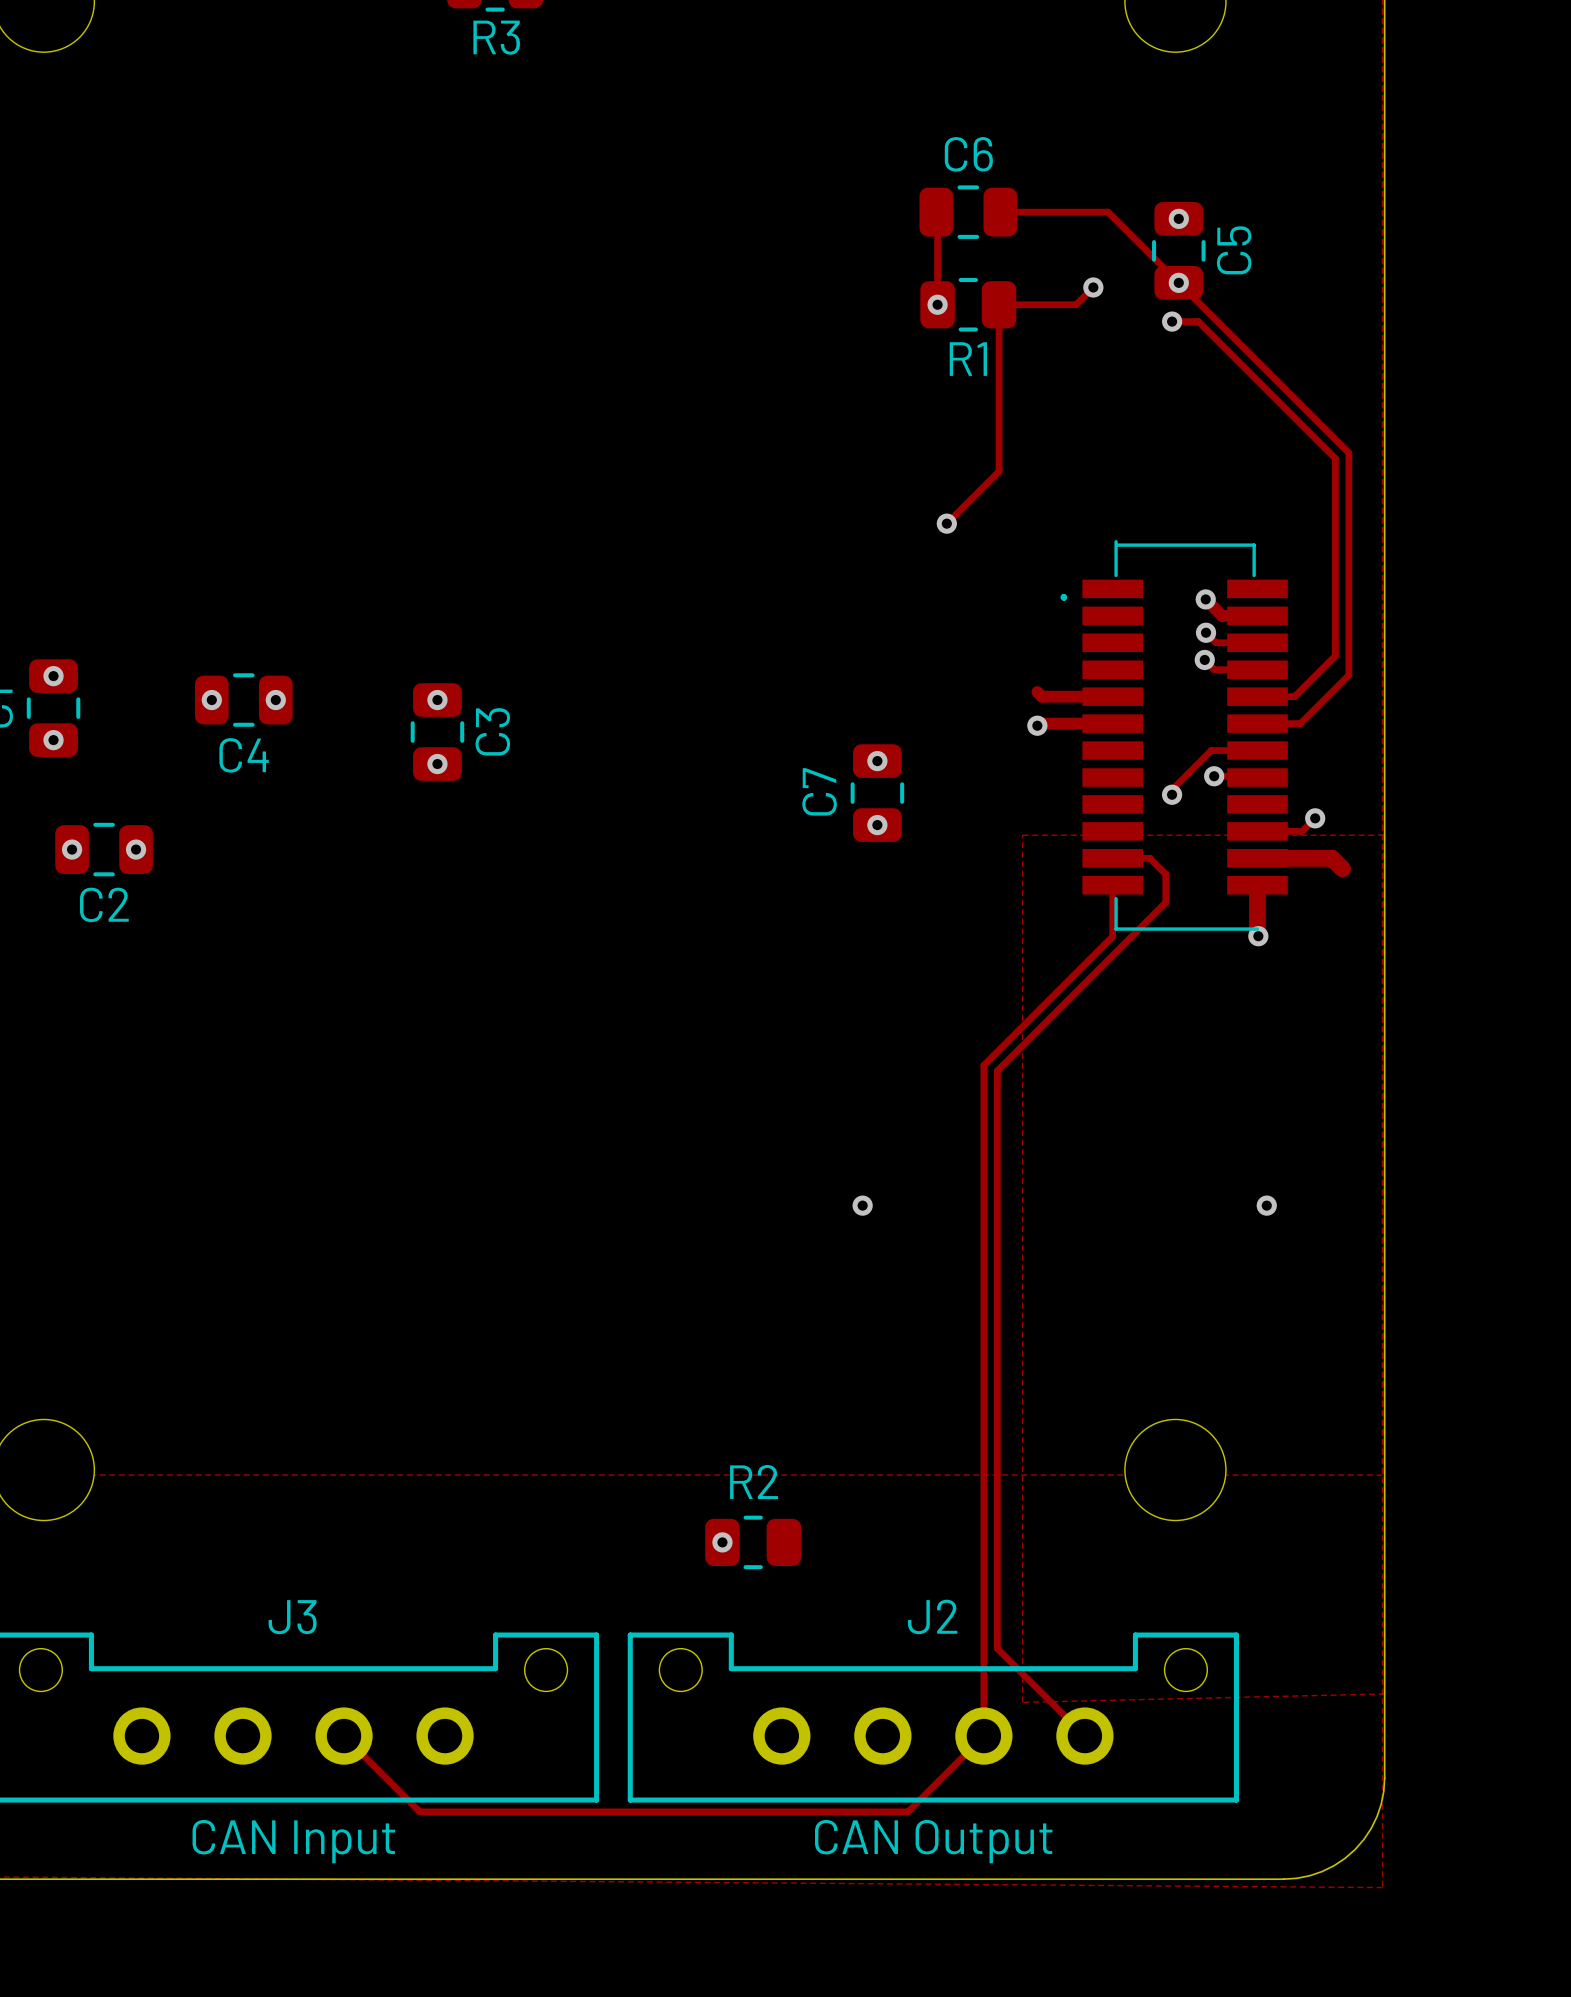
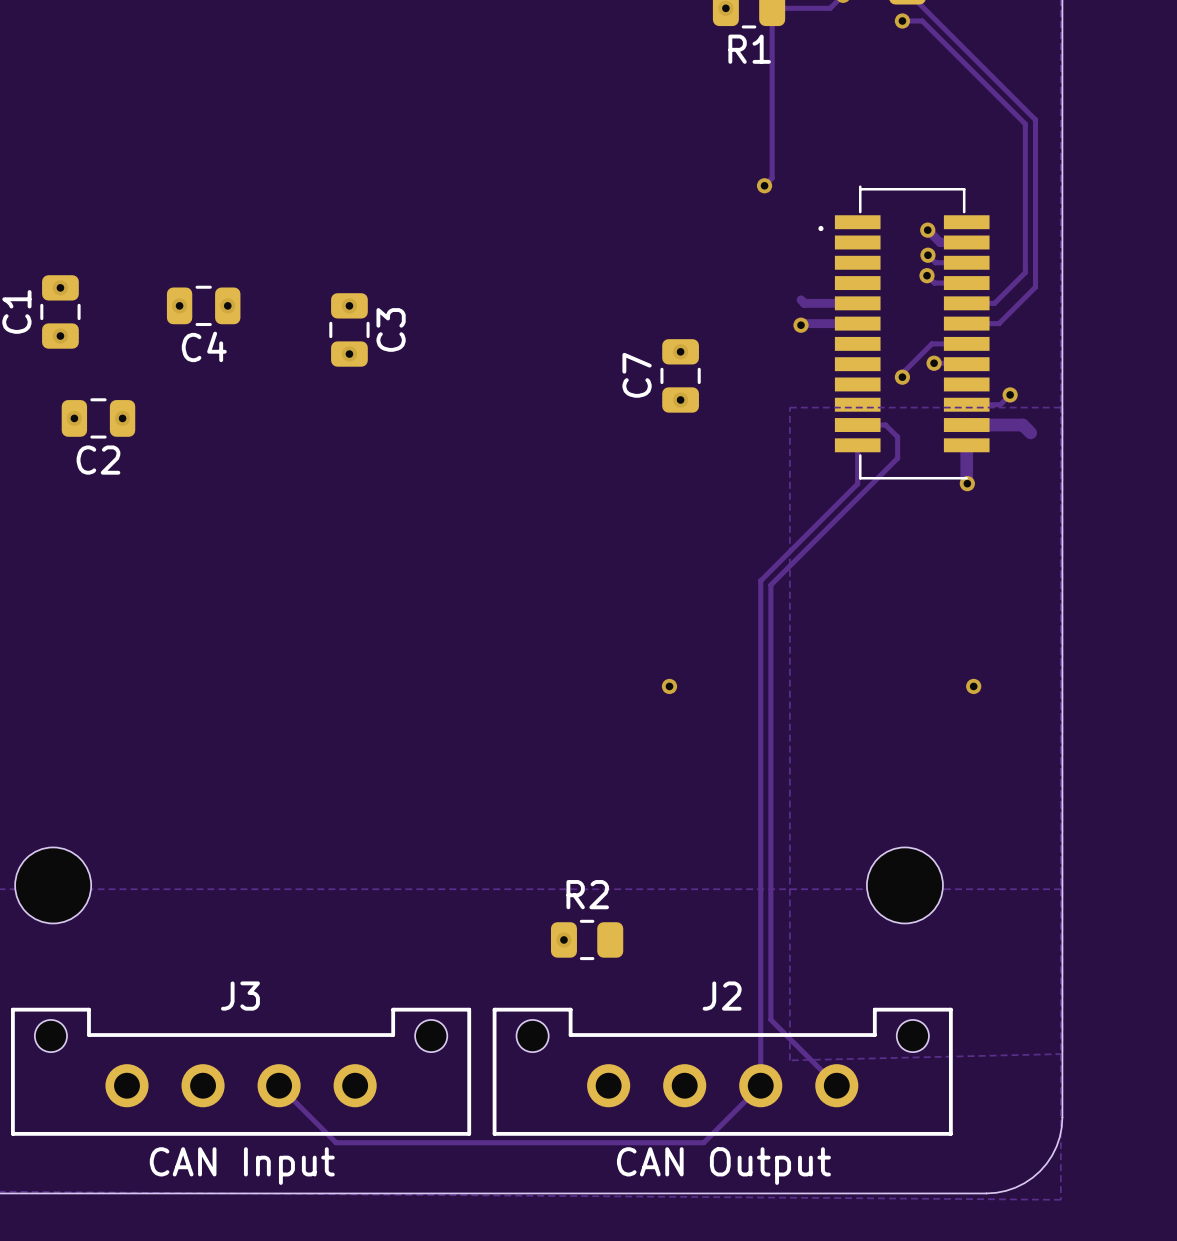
track: (999, 471) (946, 523) -> (772, 133) (772, 178) (764, 185)
via position: (946, 523) -> (764, 185)

